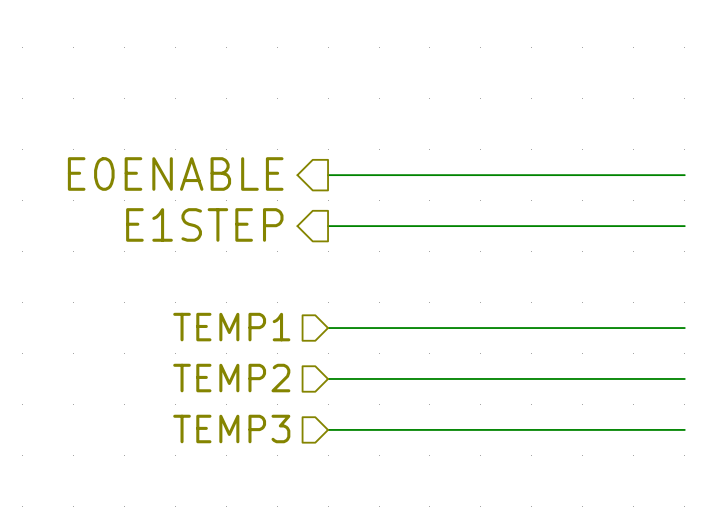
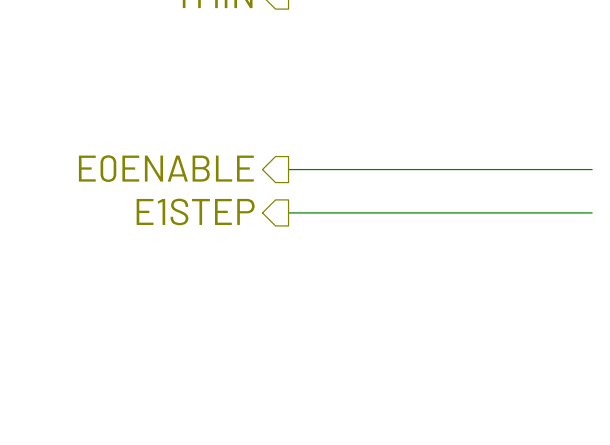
hierarchical label: TEMP1 (231, 327) -> none
wire: (328, 328) (684, 328) -> none
hierarchical label: TEMP2 (231, 378) -> none
wire: (328, 378) (684, 378) -> none
hierarchical label: TEMP3 (231, 428) -> none
wire: (328, 429) (684, 429) -> none

